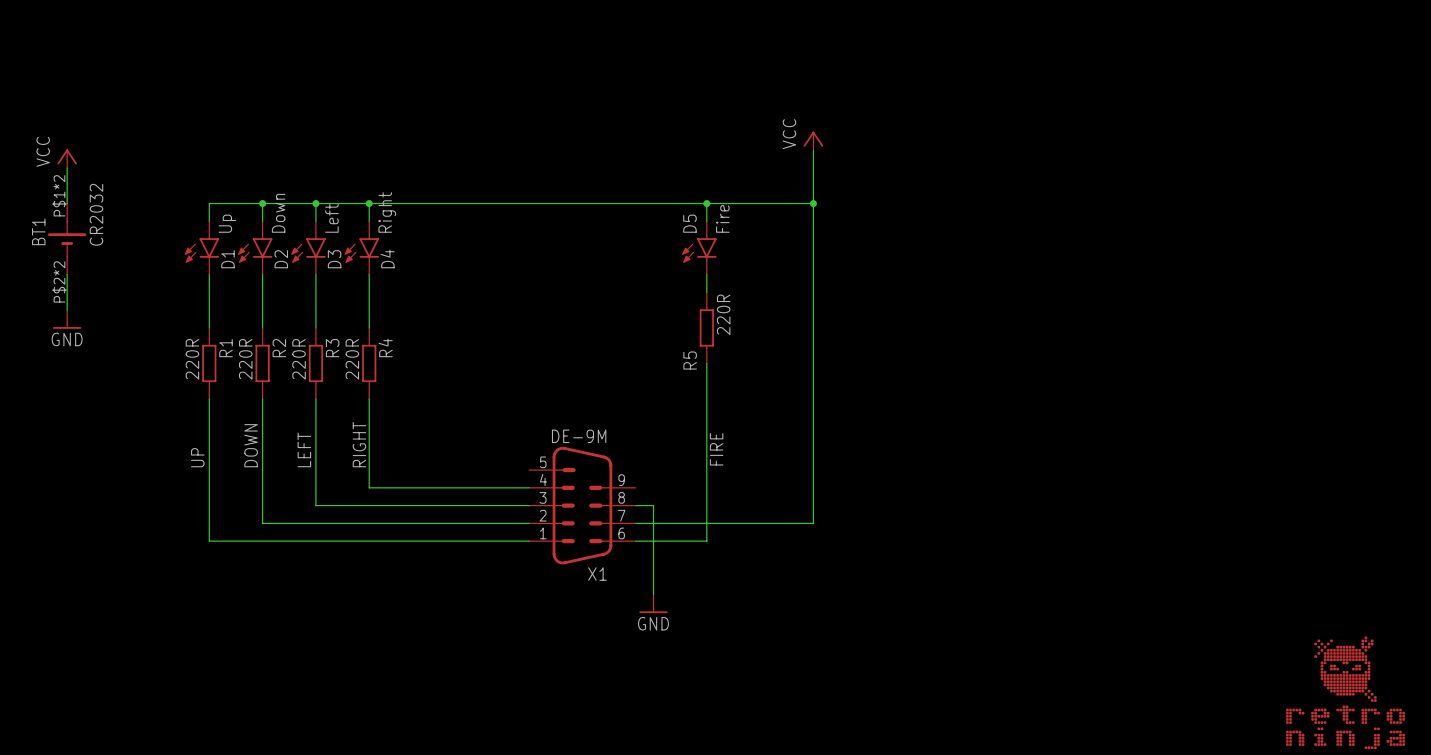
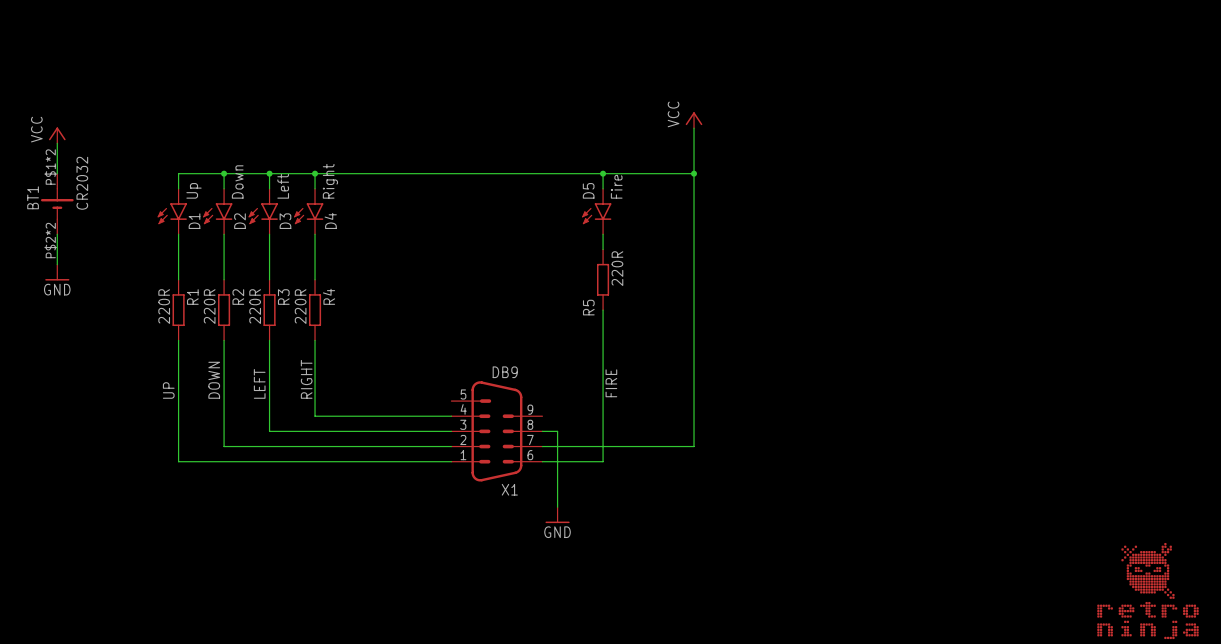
X1 value: DE-9M (579, 436) -> DB9 (505, 372)

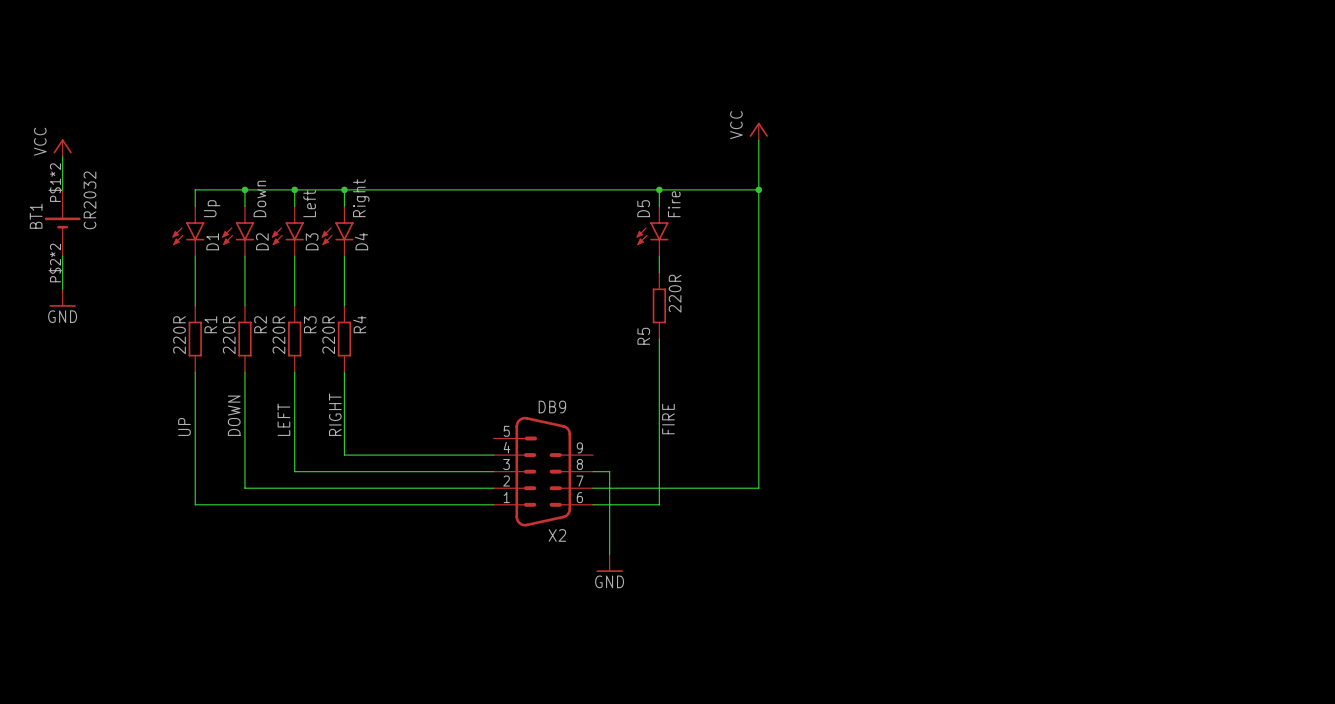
X1 name: X1 (509, 489) -> X2 (557, 535)
part: (1147, 591) -> none

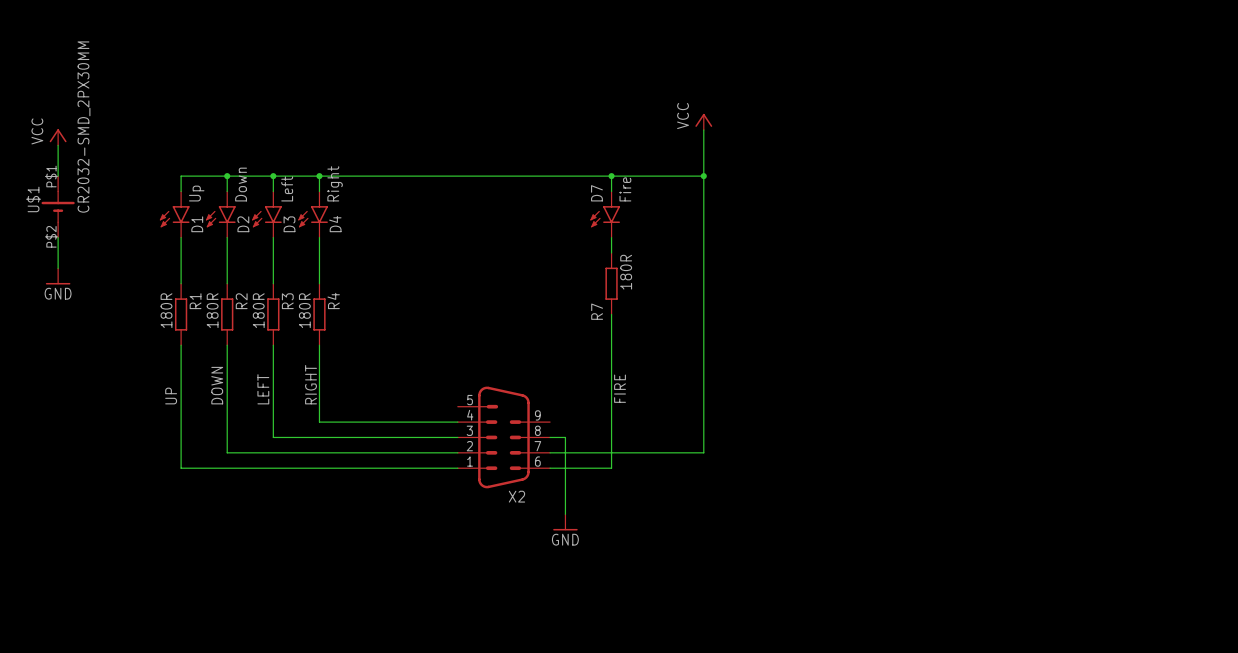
BT1 pin number: P$1*2 (55, 182) -> P$1 (51, 176)
BT1 value: CR2032 (90, 200) -> CR2032-SMD_2PX30MM (83, 127)
D5 name: D5 (643, 208) -> D7 (596, 193)
BT1 name: BT1 (36, 216) -> U$1 (33, 199)
BT1 pin number: P$2*2 (55, 263) -> P$2 (51, 236)
R5 value: 220R (675, 293) -> 180R (626, 272)
R1 value: 220R (179, 335) -> 180R (166, 310)
R2 value: 220R (229, 335) -> 180R (212, 310)
R3 value: 220R (278, 335) -> 180R (258, 310)
R4 value: 220R (328, 335) -> 180R (304, 310)
R5 name: R5 (643, 336) -> R7 (597, 311)
X2 value: DB9 (552, 407) -> none

